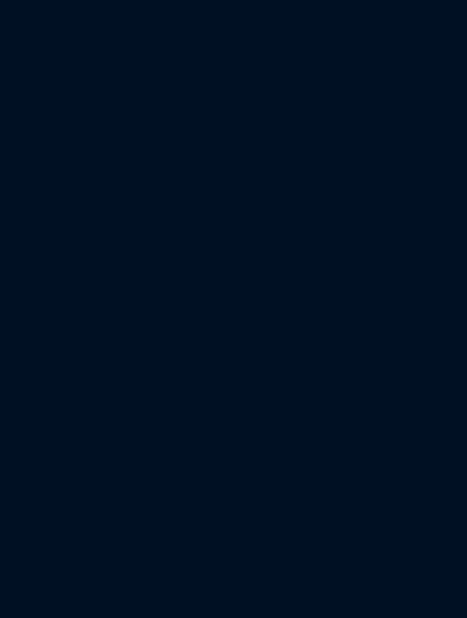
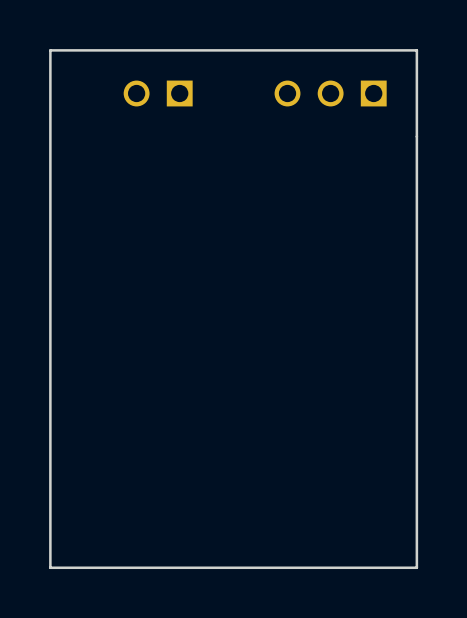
board edge: none -> (416, 50) (50, 50) (50, 567) (416, 567) (416, 50)
part: none -> (158, 93)
part: none -> (330, 93)

